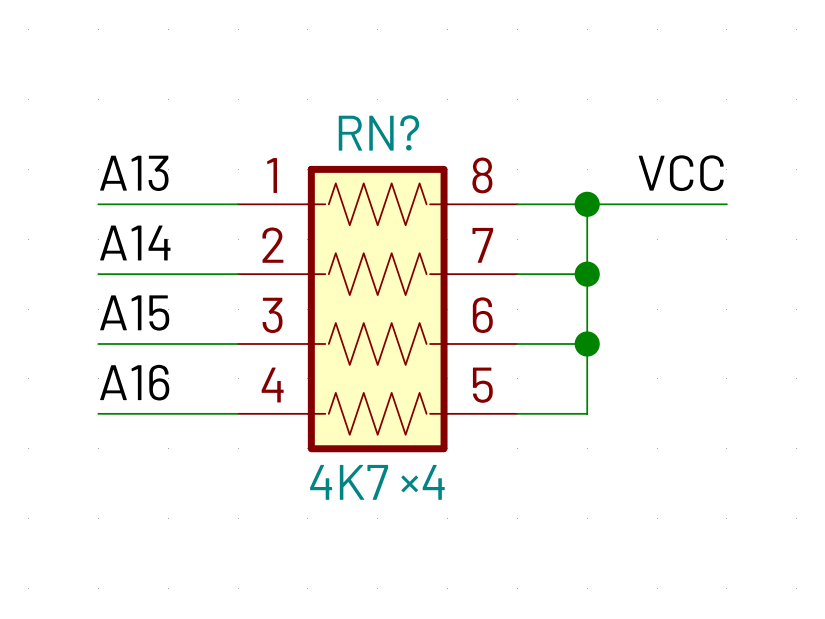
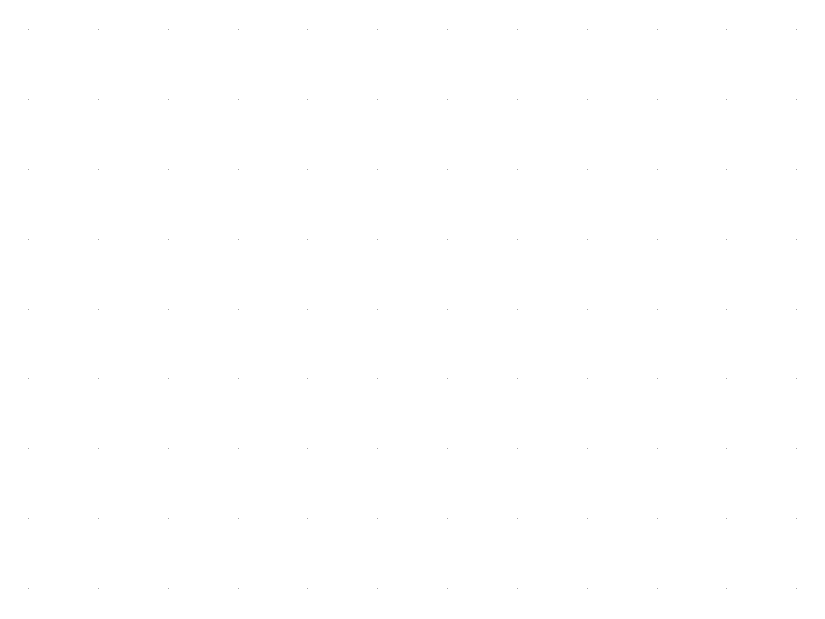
label: A13 (134, 173) -> none
label: VCC (681, 173) -> none
wire: (98, 204) (238, 204) -> none
wire: (517, 204) (726, 204) -> none
wire: (587, 204) (587, 413) (517, 413) -> none
junction: (587, 204) -> none
label: A14 (135, 242) -> none
wire: (98, 274) (238, 274) -> none
wire: (517, 274) (587, 274) -> none
junction: (587, 274) -> none
RN?: 4K7 ×4 (377, 309) -> none
label: A15 (134, 313) -> none
wire: (98, 343) (238, 343) -> none
wire: (517, 343) (587, 343) -> none
junction: (587, 343) -> none
label: A16 (134, 382) -> none
wire: (98, 413) (238, 413) -> none

